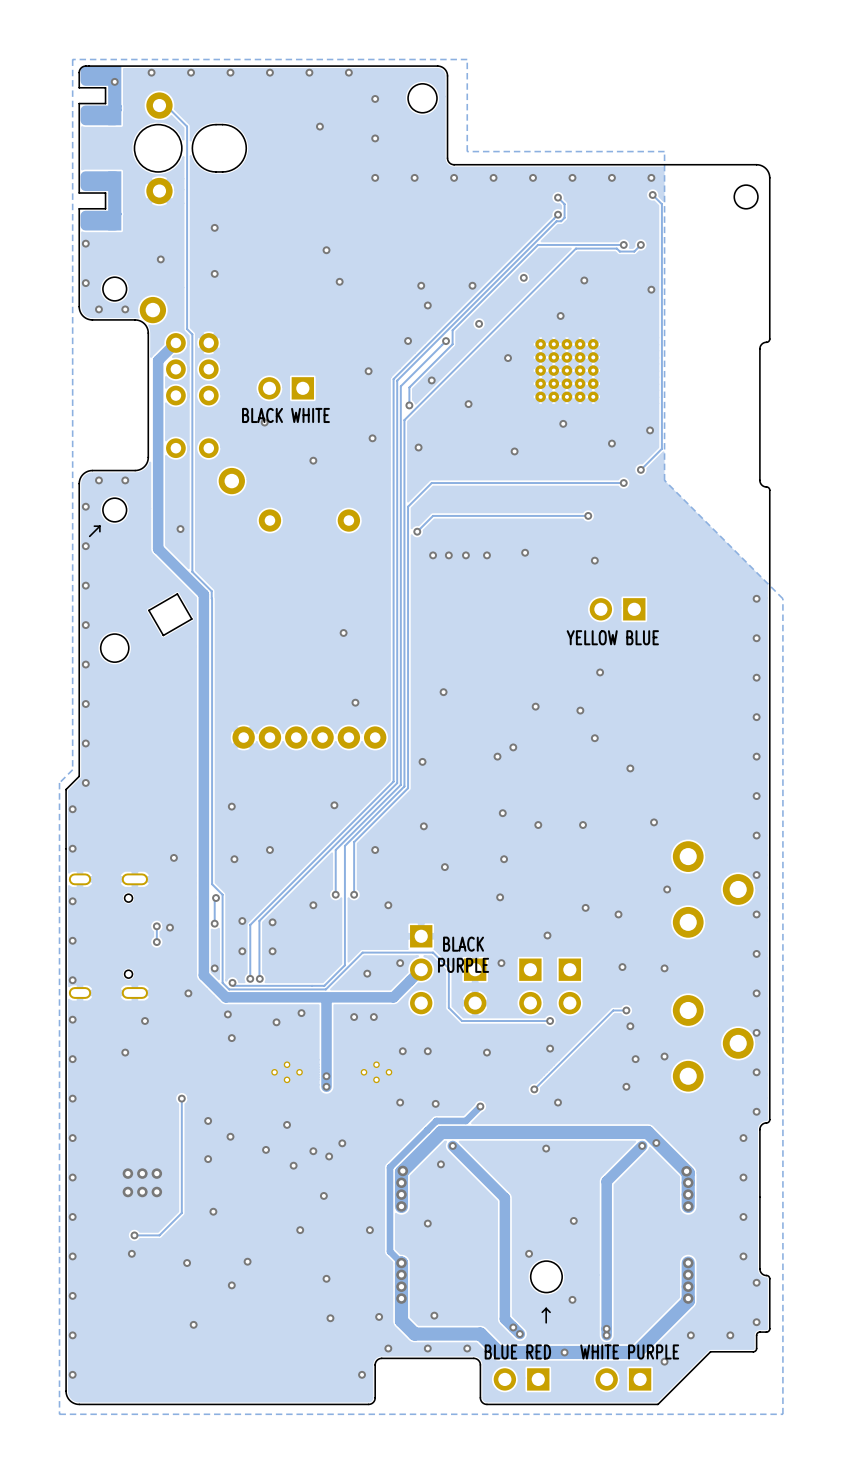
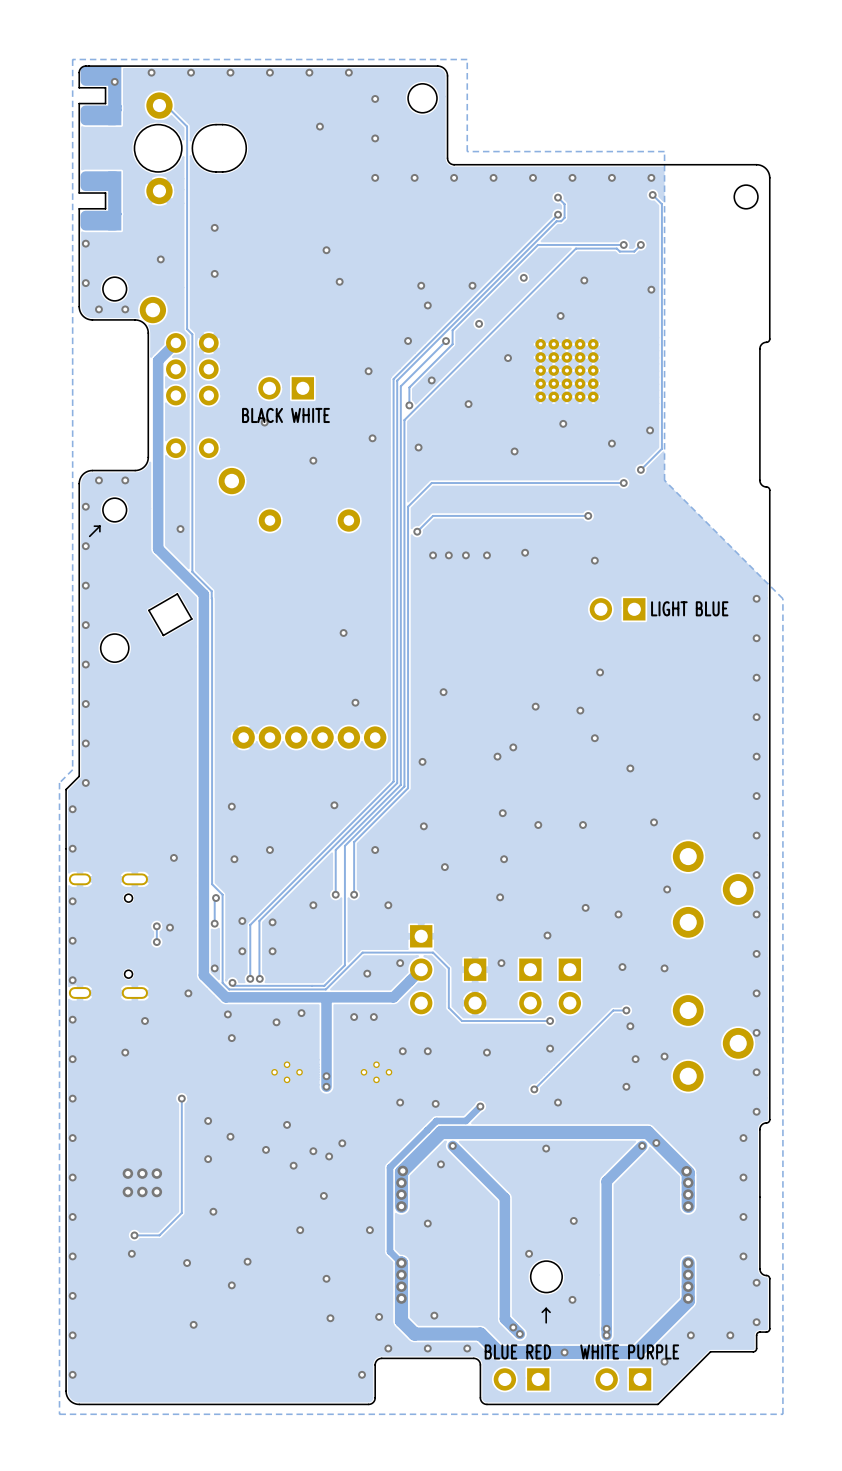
text: none -> LIGHT BLUE (689, 608)
text: YELLOW BLUE (612, 637) -> none
text: BLACK (463, 944) -> none
text: PURPLE (463, 965) -> none

